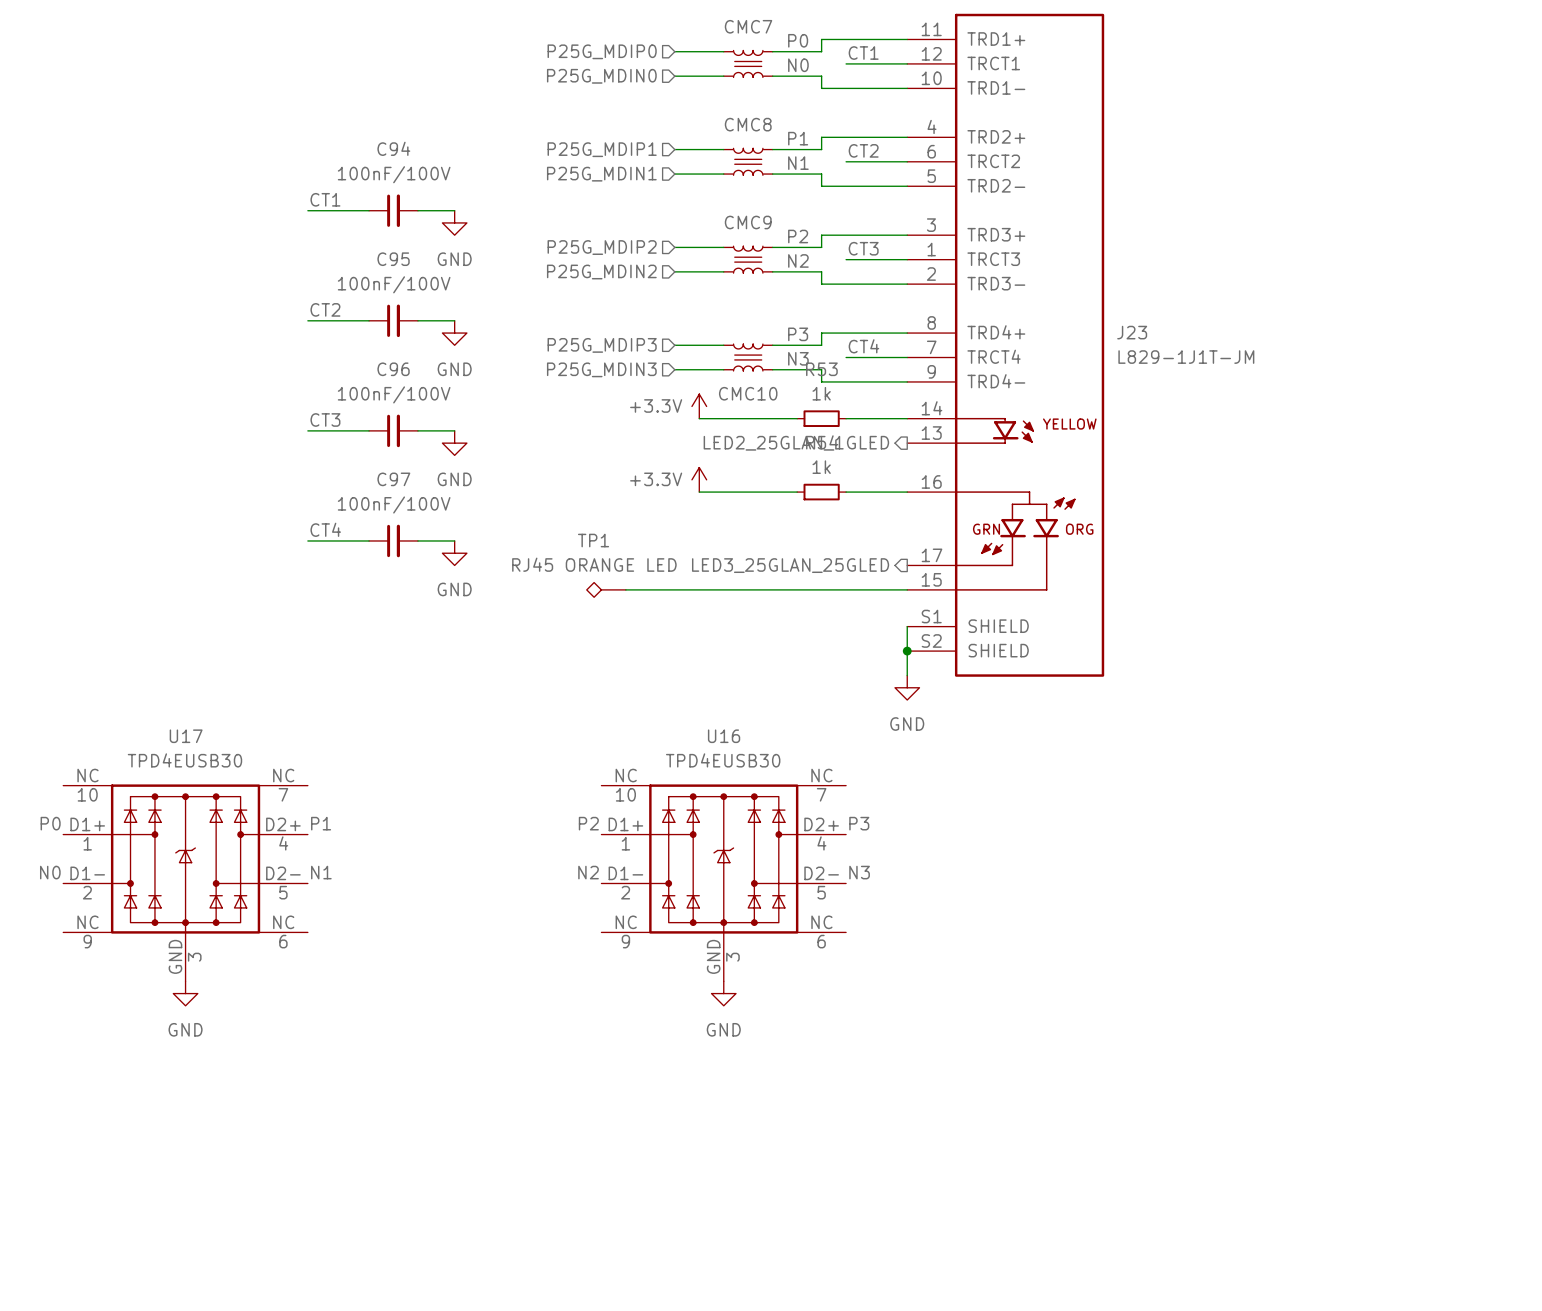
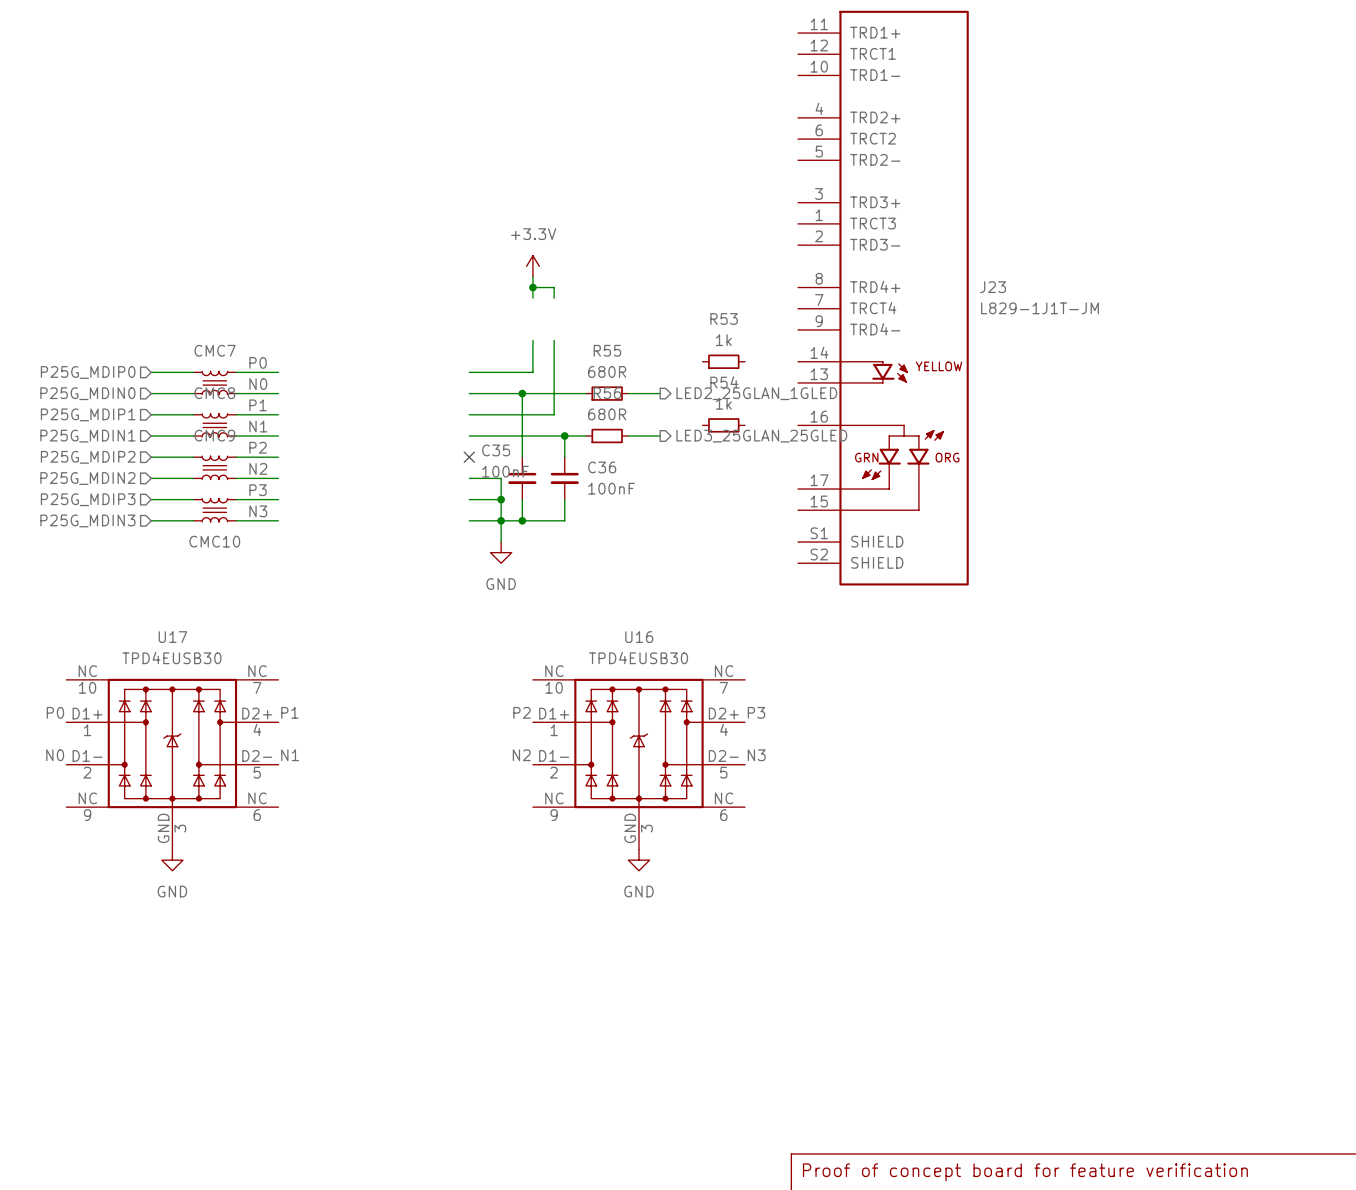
wire: (907, 39) (821, 39) (821, 51) (772, 51) -> none
label: P0 (798, 40) -> none
hierarchical label: P25G_MDIP0 (602, 51) -> none
wire: (674, 51) (723, 51) -> none
label: CT1 (863, 53) -> none
CMC7 position: (748, 63) -> (214, 382)
wire: (846, 63) (907, 63) -> none
label: N0 (798, 65) -> none
hierarchical label: P25G_MDIN0 (601, 76) -> none
wire: (674, 76) (723, 76) -> none
wire: (772, 76) (821, 76) (821, 88) (907, 88) -> none
wire: (907, 137) (821, 137) (821, 149) (772, 149) -> none
label: P1 (798, 138) -> none
hierarchical label: P25G_MDIP1 (602, 149) -> none
wire: (674, 149) (723, 149) -> none
label: CT2 (863, 150) -> none
CMC8 position: (748, 161) -> (214, 425)
wire: (846, 161) (907, 161) -> none
label: N1 (798, 163) -> none
hierarchical label: P25G_MDIN1 (601, 174) -> none
wire: (674, 174) (723, 174) -> none
wire: (772, 174) (821, 174) (821, 186) (907, 186) -> none
label: CT1 (325, 199) -> none
wire: (307, 210) (369, 210) -> none
C94: 100nF/100V (393, 210) -> none
wire: (417, 210) (454, 210) -> none
power symbol: GND (454, 222) -> none
wire: (907, 235) (821, 235) (821, 247) (772, 247) -> none
label: P2 (798, 236) -> none
hierarchical label: P25G_MDIP2 (602, 247) -> none
wire: (674, 247) (723, 247) -> none
label: CT3 (863, 248) -> none
CMC9 position: (748, 259) -> (214, 467)
wire: (846, 259) (907, 259) -> none
label: N2 (798, 260) -> none
wire: (674, 271) (723, 271) -> none
wire: (772, 271) (821, 271) (821, 284) (907, 284) -> none
hierarchical label: P25G_MDIN2 (601, 272) -> none
power symbol: none -> +3.3V (532, 266)
label: CT2 (325, 309) -> none
wire: (307, 320) (369, 320) -> none
C95: 100nF/100V (393, 320) -> none
wire: (417, 320) (454, 320) -> none
wire: none -> (532, 276) (532, 298)
power symbol: GND (454, 333) -> none
wire: none -> (532, 287) (554, 287) (554, 298)
junction: none -> (532, 287)
wire: (907, 333) (821, 333) (821, 345) (772, 345) -> none
label: P3 (798, 334) -> none
hierarchical label: P25G_MDIP3 (602, 345) -> none
wire: (674, 345) (723, 345) -> none
label: CT4 (863, 346) -> none
CMC10 position: (748, 357) -> (214, 510)
wire: (846, 357) (907, 357) -> none
label: N3 (798, 358) -> none
hierarchical label: P25G_MDIN3 (601, 369) -> none
wire: (674, 369) (723, 369) -> none
wire: (772, 369) (821, 369) (821, 381) (907, 381) -> none
wire: none -> (532, 340) (532, 372) (469, 372)
wire: none -> (554, 340) (554, 414) (469, 414)
power symbol: +3.3V (699, 406) -> none
wire: (699, 418) (797, 418) -> none
wire: (846, 418) (907, 418) -> none
label: none -> P0 (258, 362)
label: CT3 (325, 419) -> none
wire: none -> (151, 372) (193, 372)
wire: (307, 430) (369, 430) -> (278, 372) (236, 372)
C96: 100nF/100V (393, 430) -> none
wire: (417, 430) (454, 430) -> none
hierarchical label: none -> P25G_MDIP0 (88, 372)
power symbol: GND (454, 443) -> none
hierarchical label rotation: 0° (796, 443) -> 180° (756, 393)
label: none -> N0 (258, 384)
hierarchical label: none -> P25G_MDIN0 (87, 393)
wire: none -> (151, 393) (193, 393)
wire: none -> (236, 393) (278, 393)
wire: none -> (469, 393) (585, 393)
wire: none -> (522, 393) (522, 457)
junction: none -> (522, 393)
R55: none -> 680R (607, 393)
wire: none -> (628, 393) (660, 393)
label: none -> P1 (258, 405)
hierarchical label: none -> P25G_MDIP1 (88, 414)
wire: none -> (151, 414) (193, 414)
wire: none -> (236, 414) (278, 414)
power symbol: +3.3V (699, 479) -> none
wire: (699, 492) (797, 492) -> none
wire: (846, 492) (907, 492) -> none
label: none -> N1 (258, 426)
hierarchical label: none -> P25G_MDIN1 (87, 436)
wire: none -> (151, 435) (193, 435)
wire: none -> (236, 435) (278, 435)
wire: none -> (469, 435) (585, 435)
wire: none -> (564, 435) (564, 457)
junction: none -> (564, 435)
R56: none -> 680R (607, 435)
wire: none -> (628, 435) (660, 435)
label: none -> P2 (258, 447)
hierarchical label: none -> P25G_MDIP2 (88, 457)
wire: none -> (151, 457) (193, 457)
wire: none -> (236, 457) (278, 457)
no-connect mark: none -> (469, 457)
label: CT4 (325, 529) -> none
wire: (307, 540) (369, 540) -> none
C97: 100nF/100V (393, 540) -> none
wire: (417, 540) (454, 540) -> (469, 499) (501, 499)
label: none -> N2 (258, 468)
hierarchical label: none -> P25G_MDIN2 (87, 478)
wire: none -> (151, 478) (193, 478)
wire: none -> (236, 478) (278, 478)
power symbol: GND (454, 553) -> none
wire: none -> (469, 478) (501, 478) (501, 542)
C35: none -> 100nF (522, 478)
C36: none -> 100nF (564, 478)
hierarchical label rotation: 0° (790, 565) -> 180° (761, 436)
label: none -> P3 (258, 490)
hierarchical label: none -> P25G_MDIP3 (88, 499)
wire: none -> (151, 499) (193, 499)
wire: none -> (236, 499) (278, 499)
junction: none -> (501, 499)
wire: none -> (522, 499) (522, 520)
wire: none -> (564, 499) (564, 520) (469, 520)
TP1: RJ45 ORANGE LED (606, 589) -> none
wire: (625, 589) (907, 589) -> none
label: none -> N3 (258, 511)
hierarchical label: none -> P25G_MDIN3 (87, 520)
wire: none -> (151, 520) (193, 520)
wire: none -> (236, 520) (278, 520)
junction: none -> (501, 520)
junction: none -> (522, 520)
wire: (907, 626) (907, 675) -> none
power symbol: none -> GND (501, 552)
junction: (907, 651) -> none
power symbol: GND (907, 687) -> none

